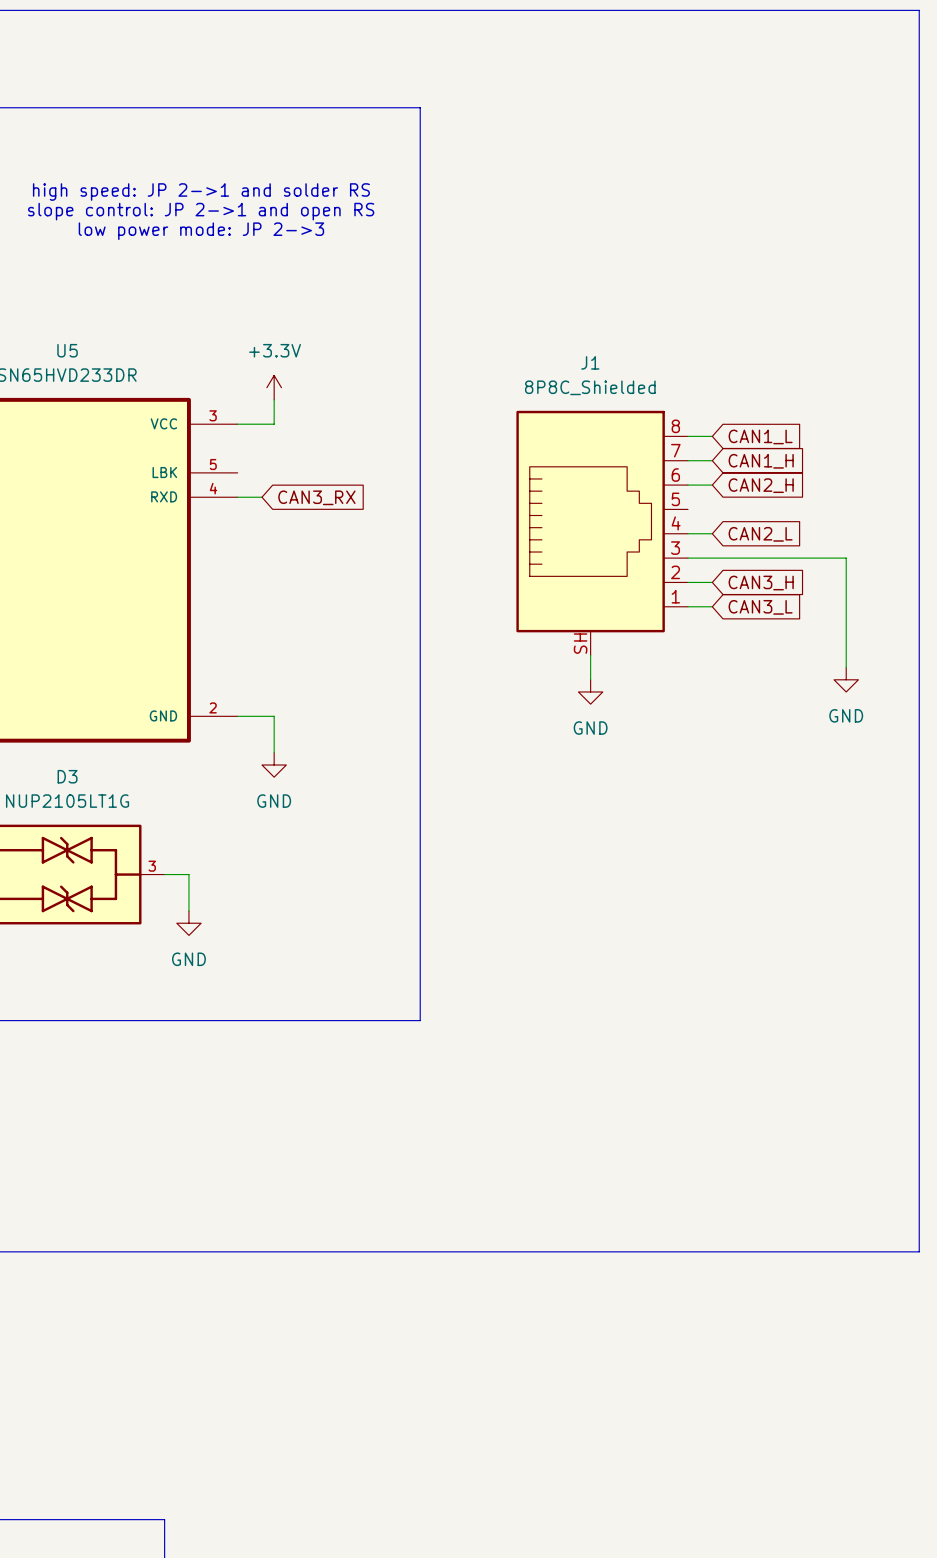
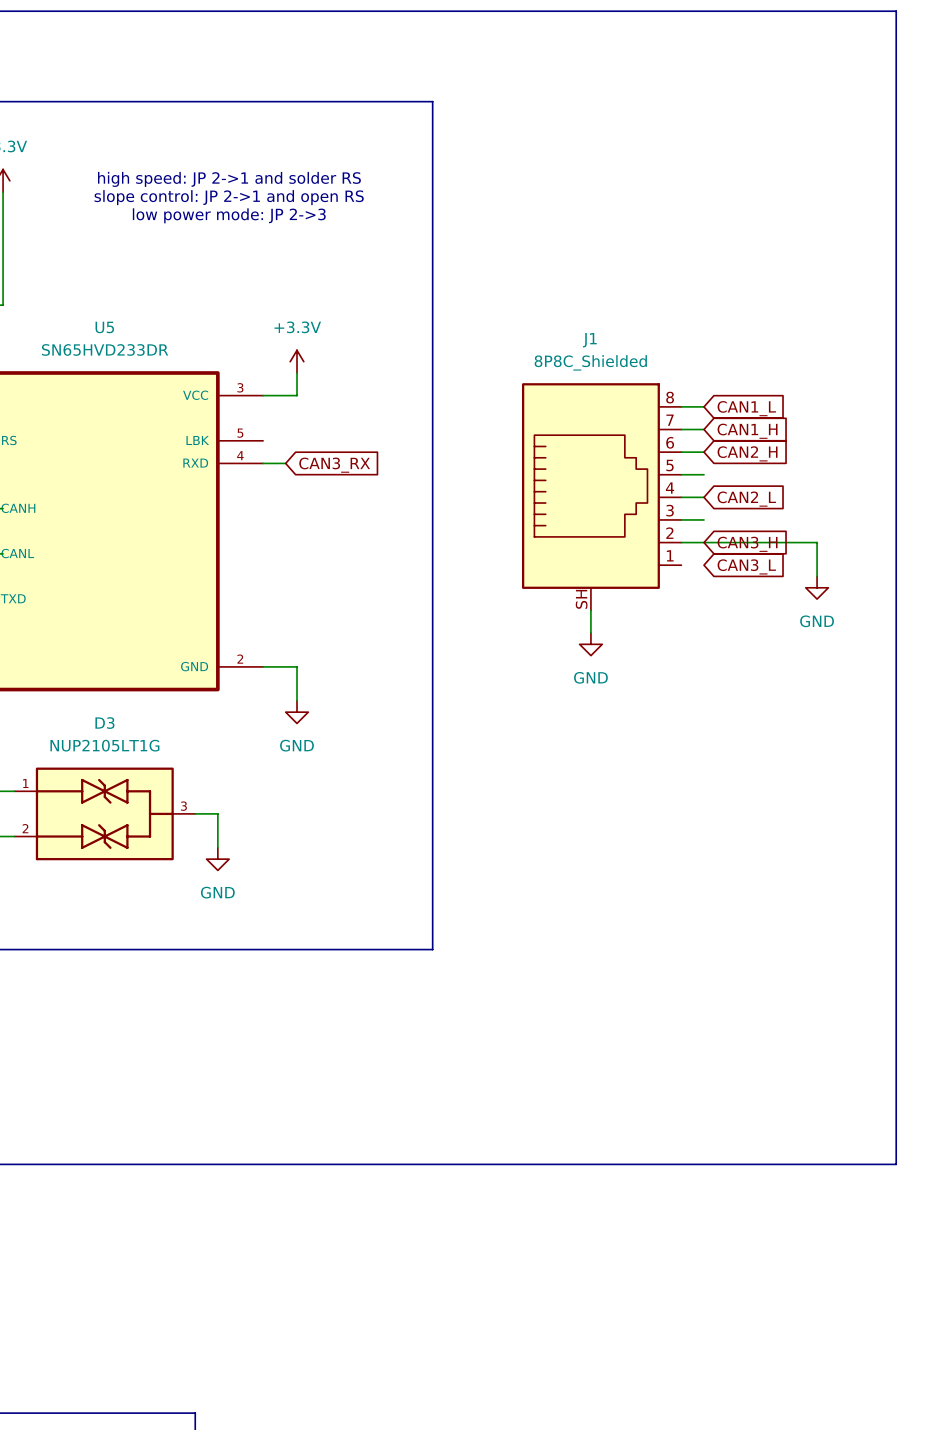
wire: (712, 558) (846, 558) (846, 667) -> none
wire: none -> (704, 542) (817, 542) (817, 576)
wire: (687, 606) (712, 606) -> (681, 474) (704, 474)
power symbol position: GND (846, 679) -> GND (817, 587)

